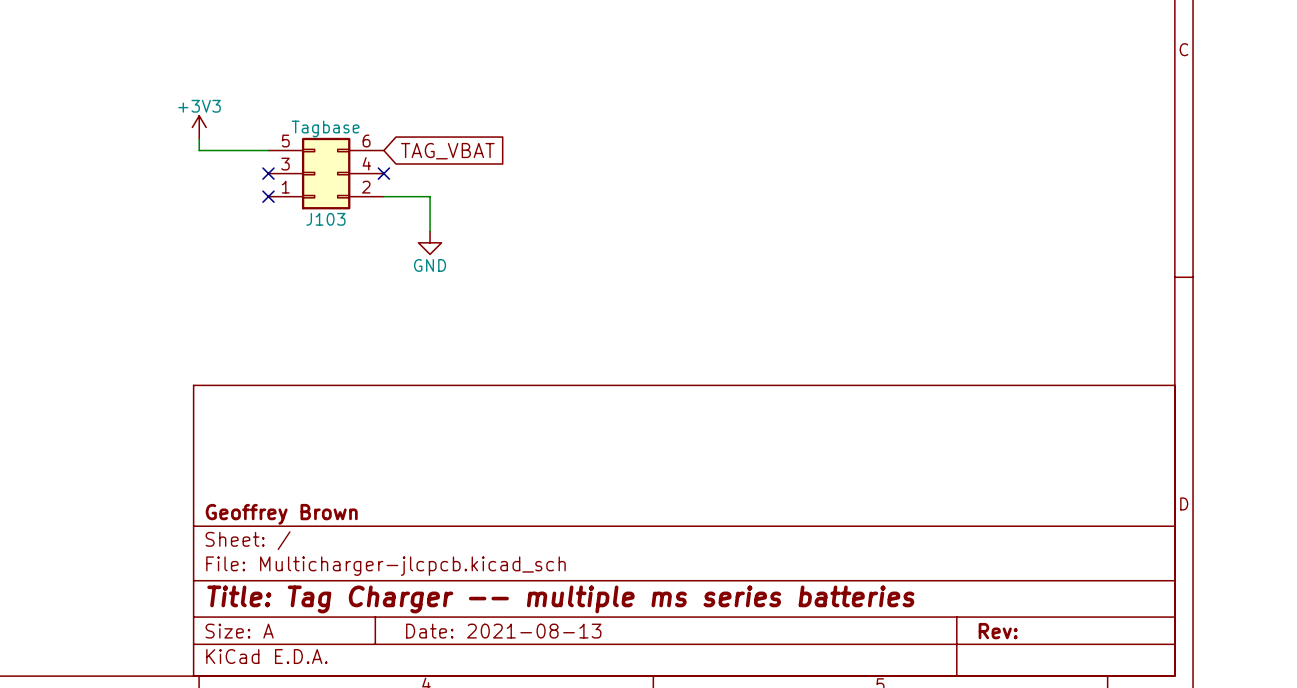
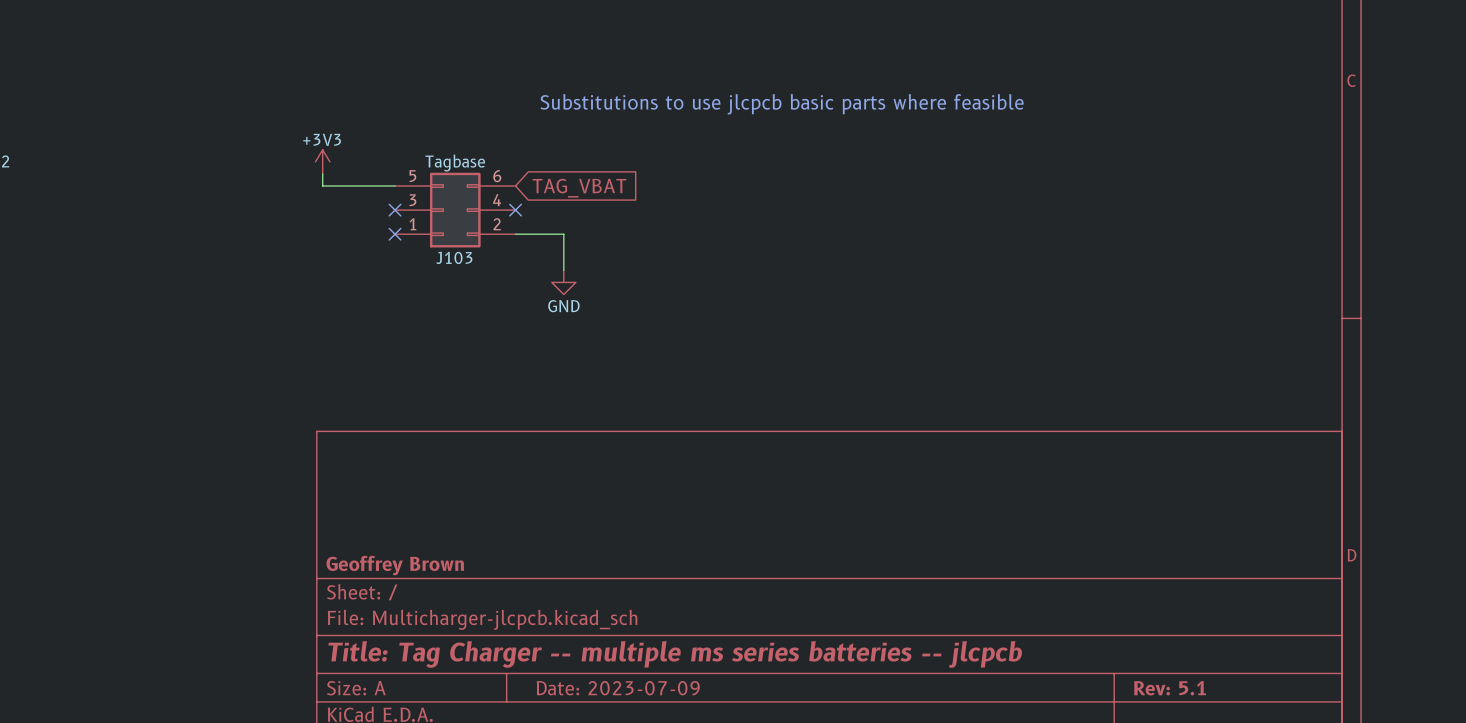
text: none -> Substitutions to use jlcpcb basic parts where feasible (782, 104)
title block: Title: Tag Charger -- multiple ms series batteries (560, 599) -> Title: Tag Charger -- multiple ms series batteries -- jlcpcb (675, 654)
title block: Date: 2021-08-13 (503, 631) -> Date: 2023-07-09 (618, 688)
title block: Rev: (998, 631) -> Rev: 5.1 (1169, 688)

